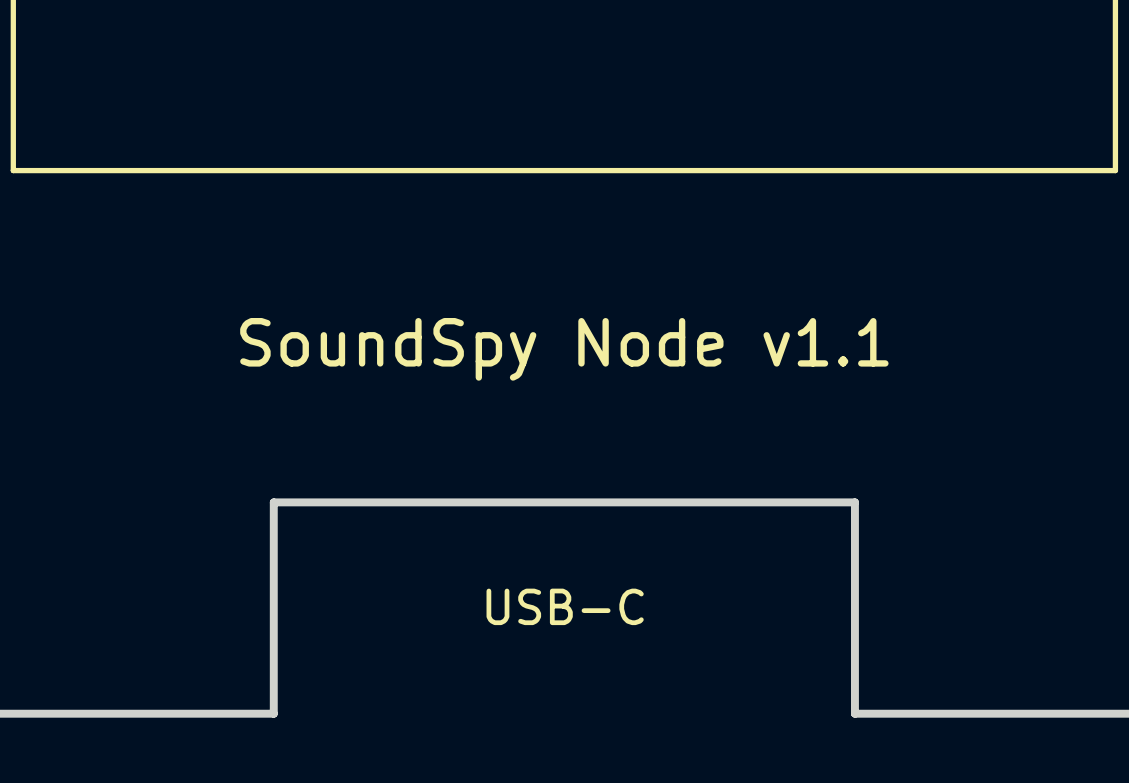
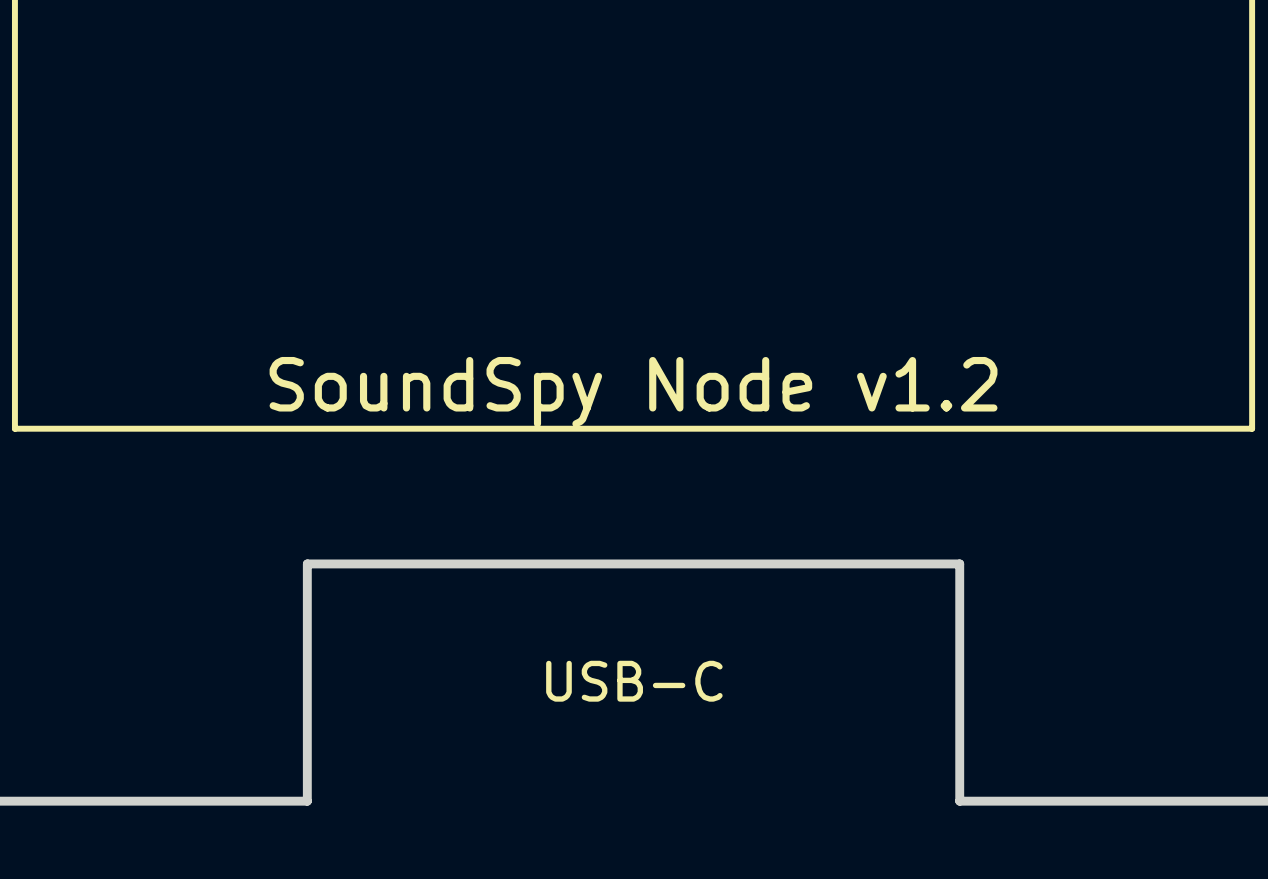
line: (13, 170) (1115, 170) -> (14, 191) (14, 428) (1252, 428) (1252, 191)
text: SoundSpy Node v1.1 (564, 349) -> SoundSpy Node v1.2 (633, 392)

